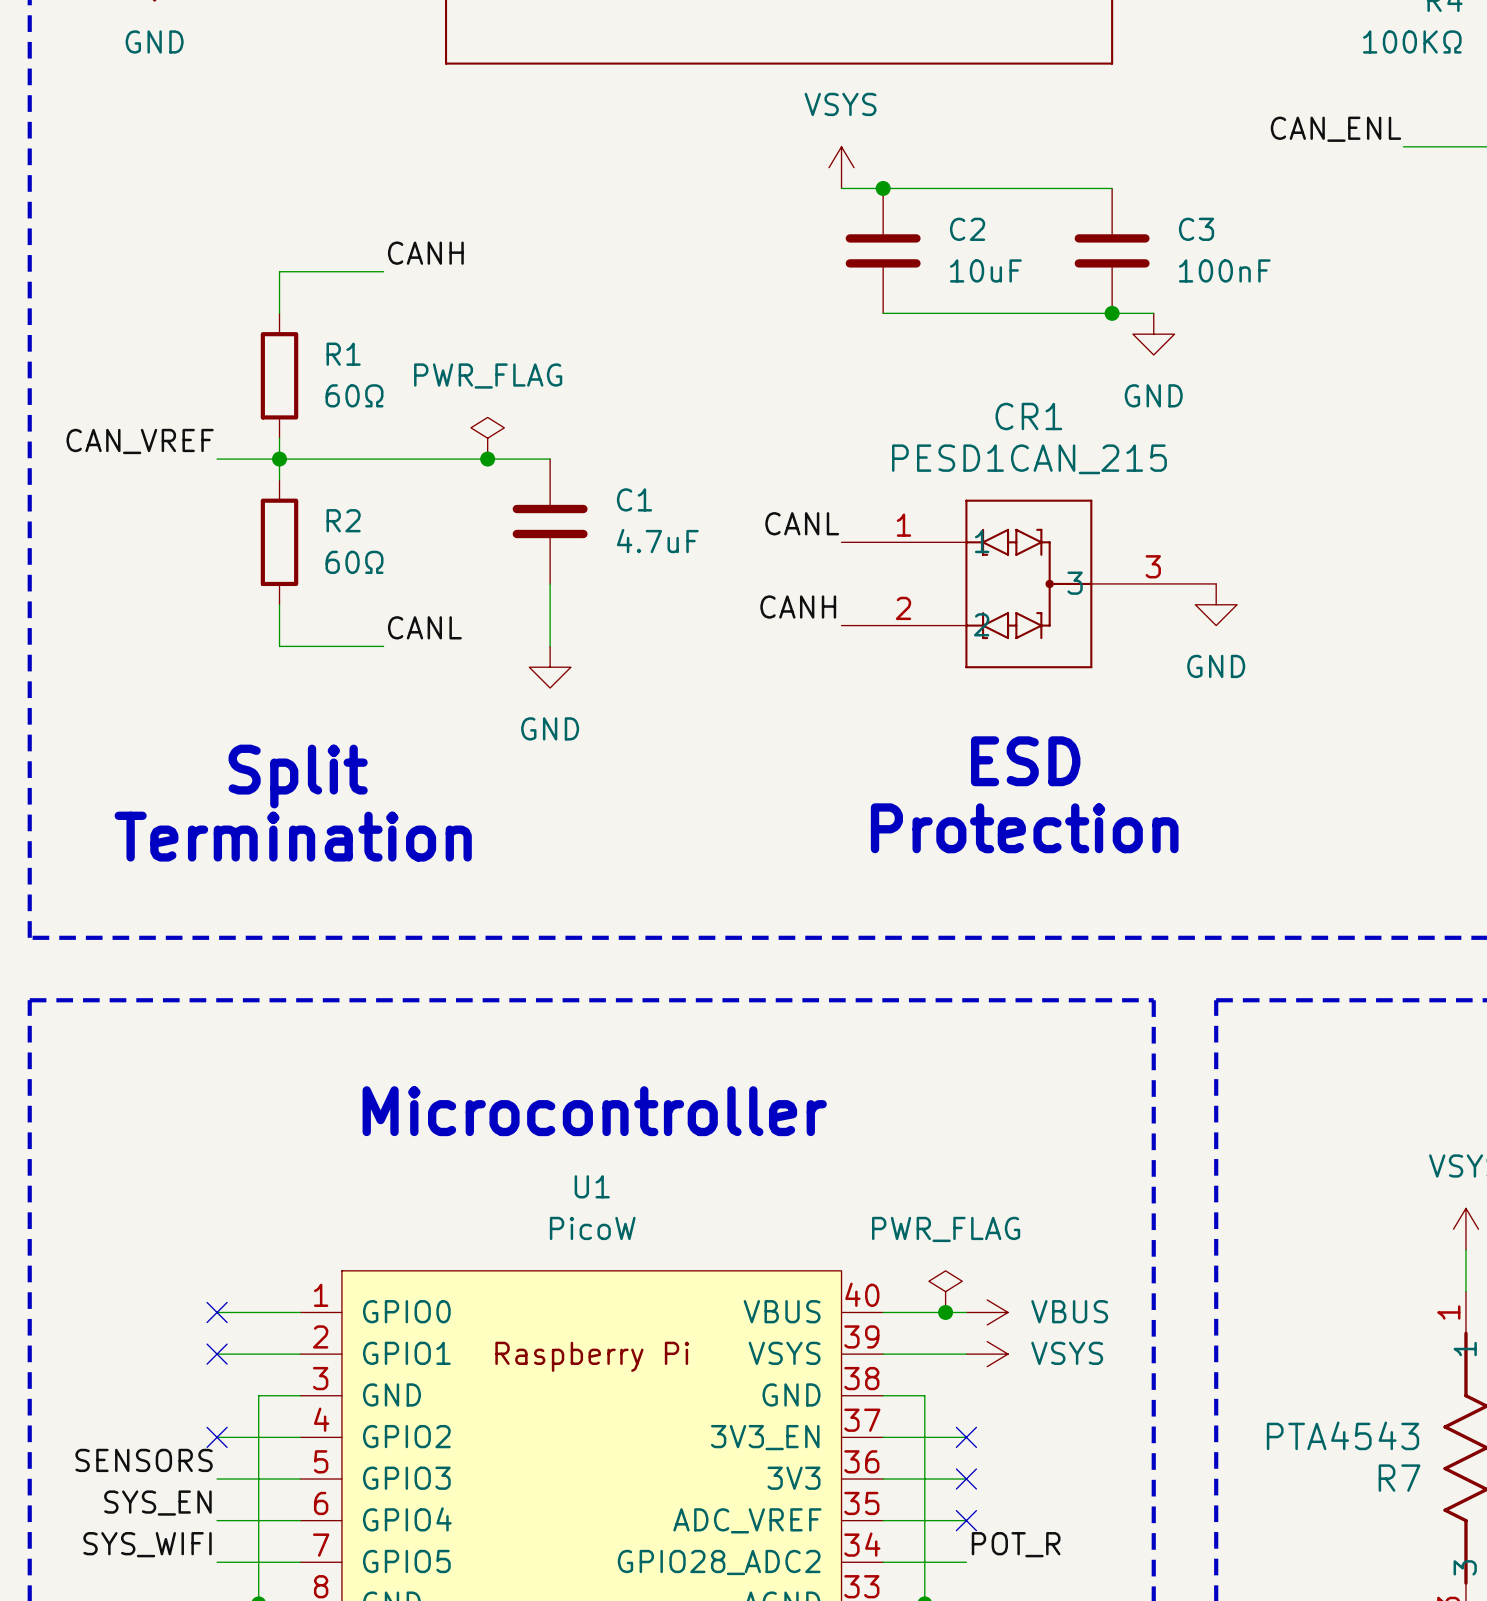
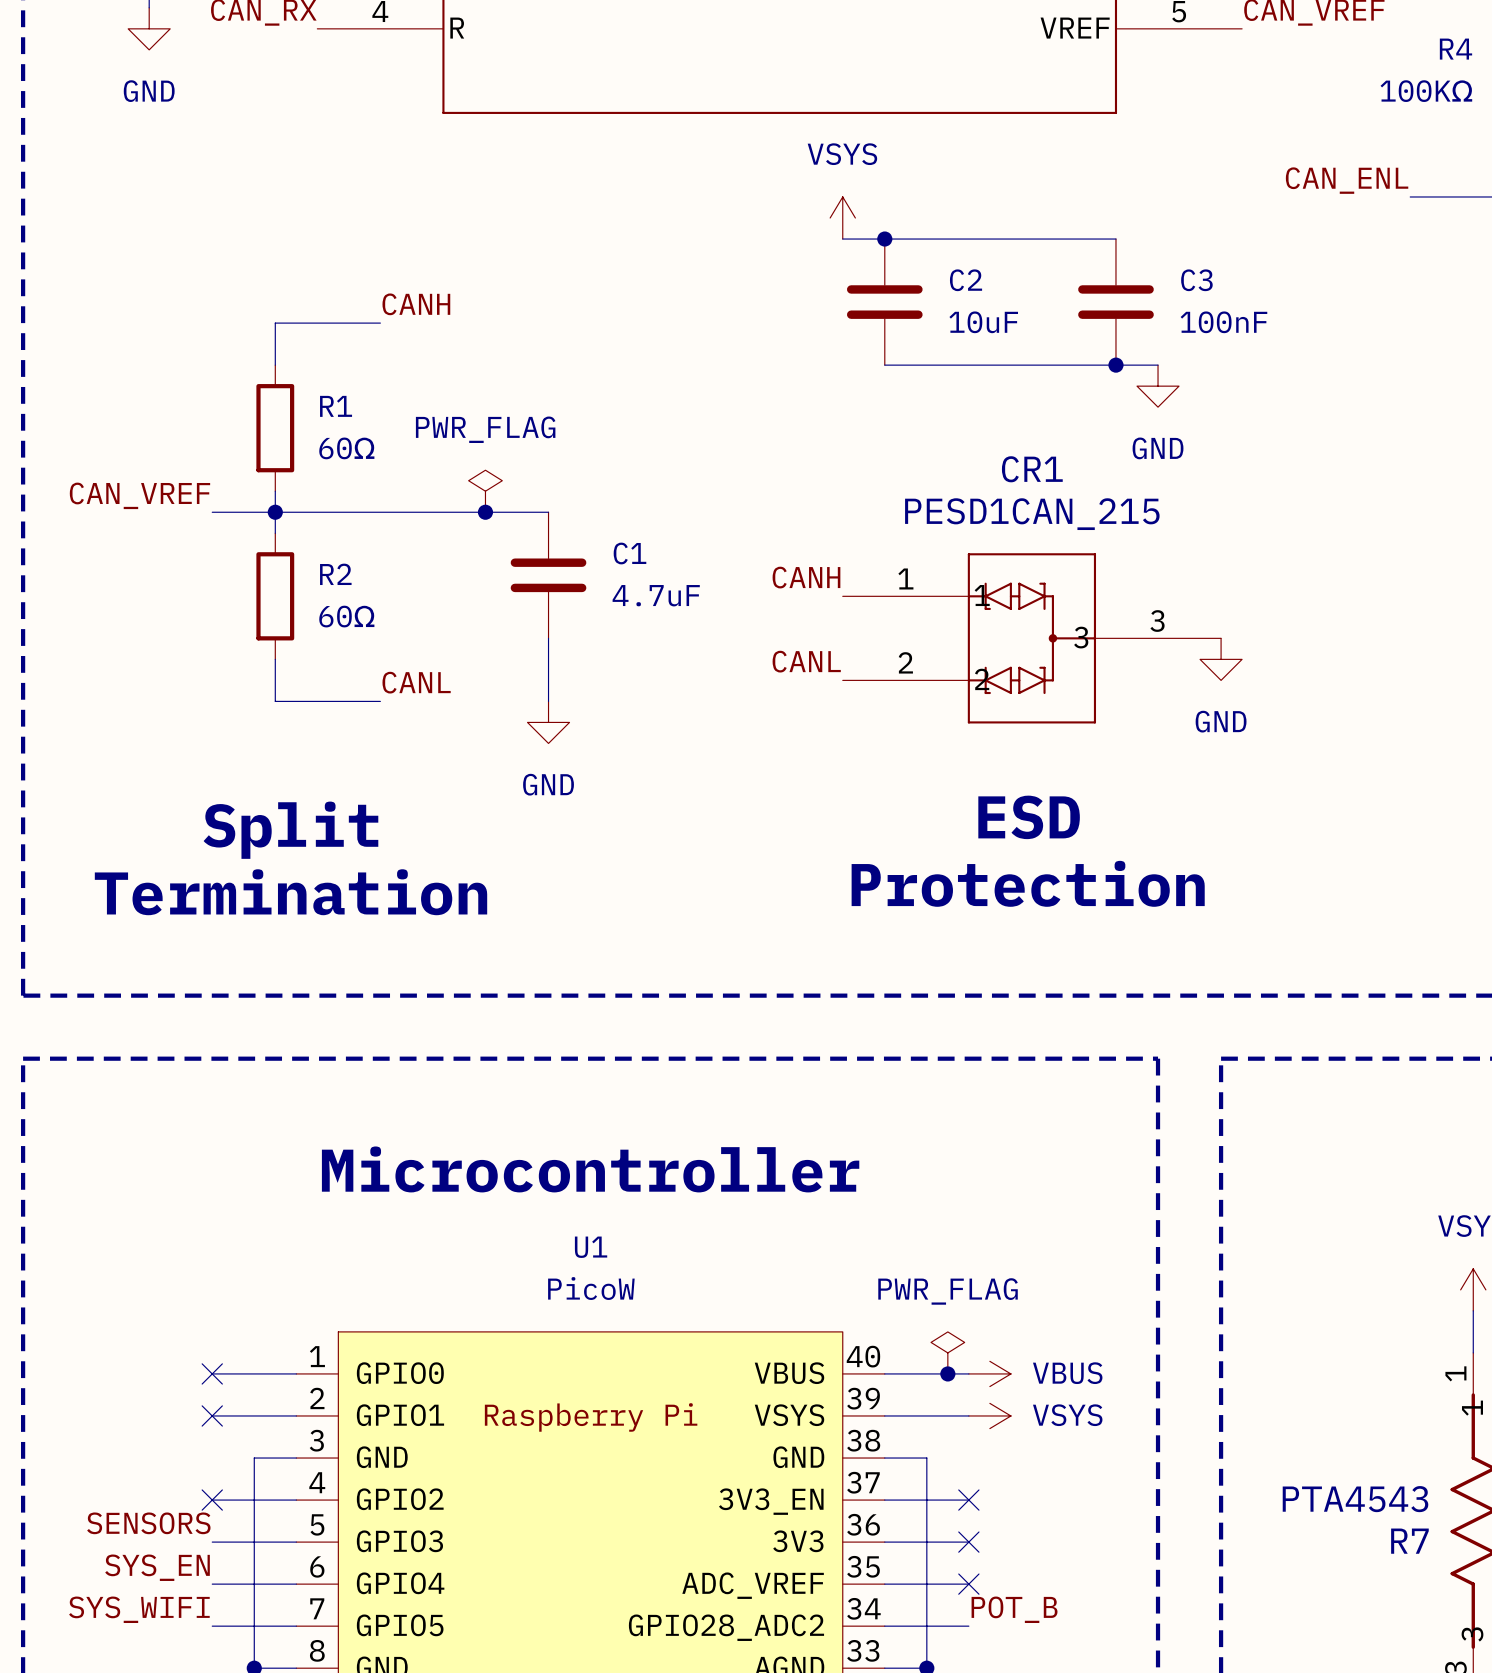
label: CANL (802, 523) -> CANH (806, 577)
label: CANH (798, 607) -> CANL (806, 661)
label: POT_R (1016, 1544) -> POT_B (1014, 1609)

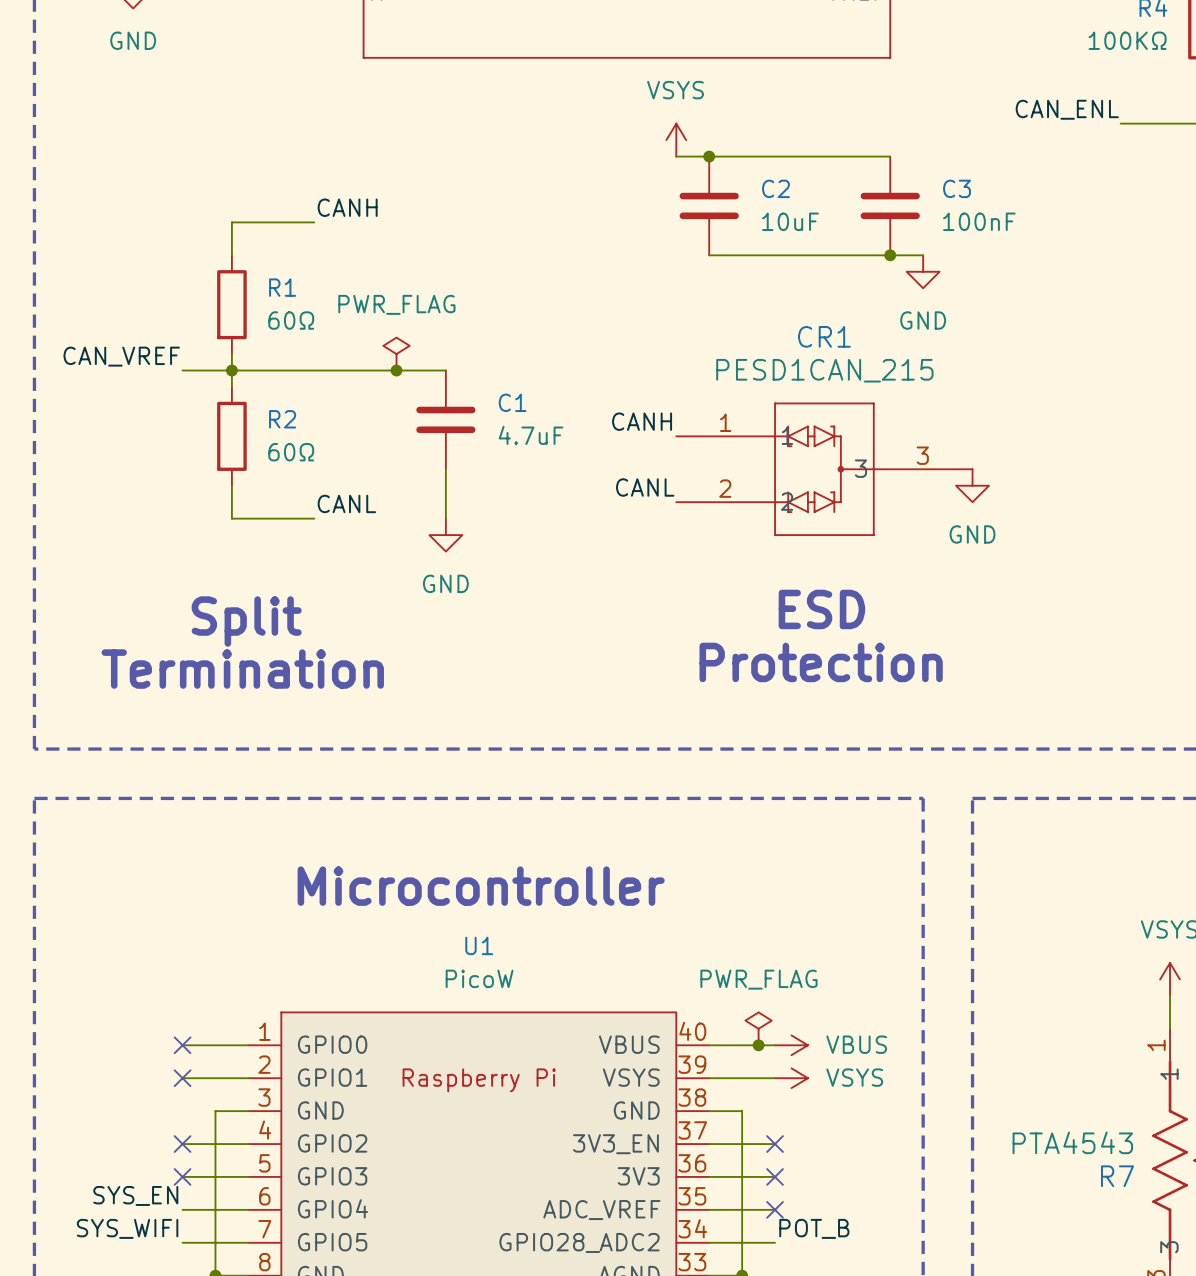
label: SENSORS (148, 1523) -> none
no-connect mark: none -> (182, 1176)

